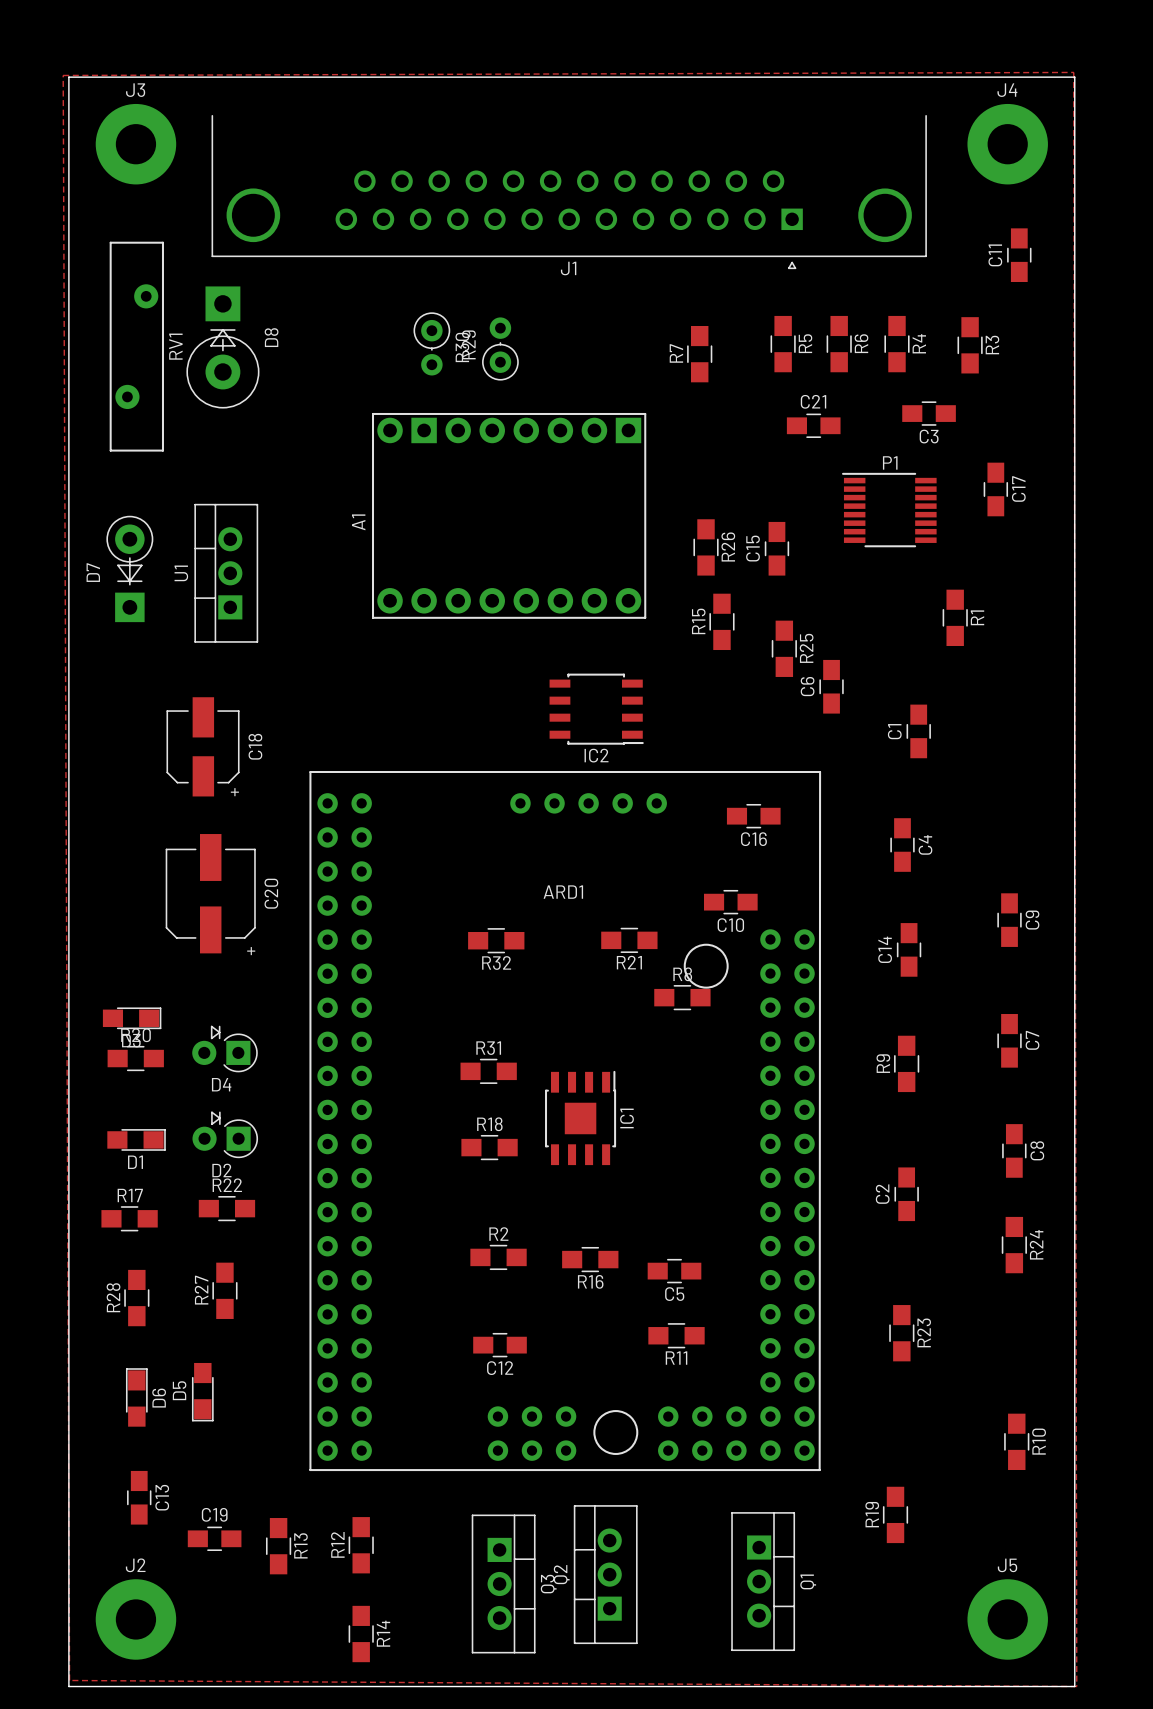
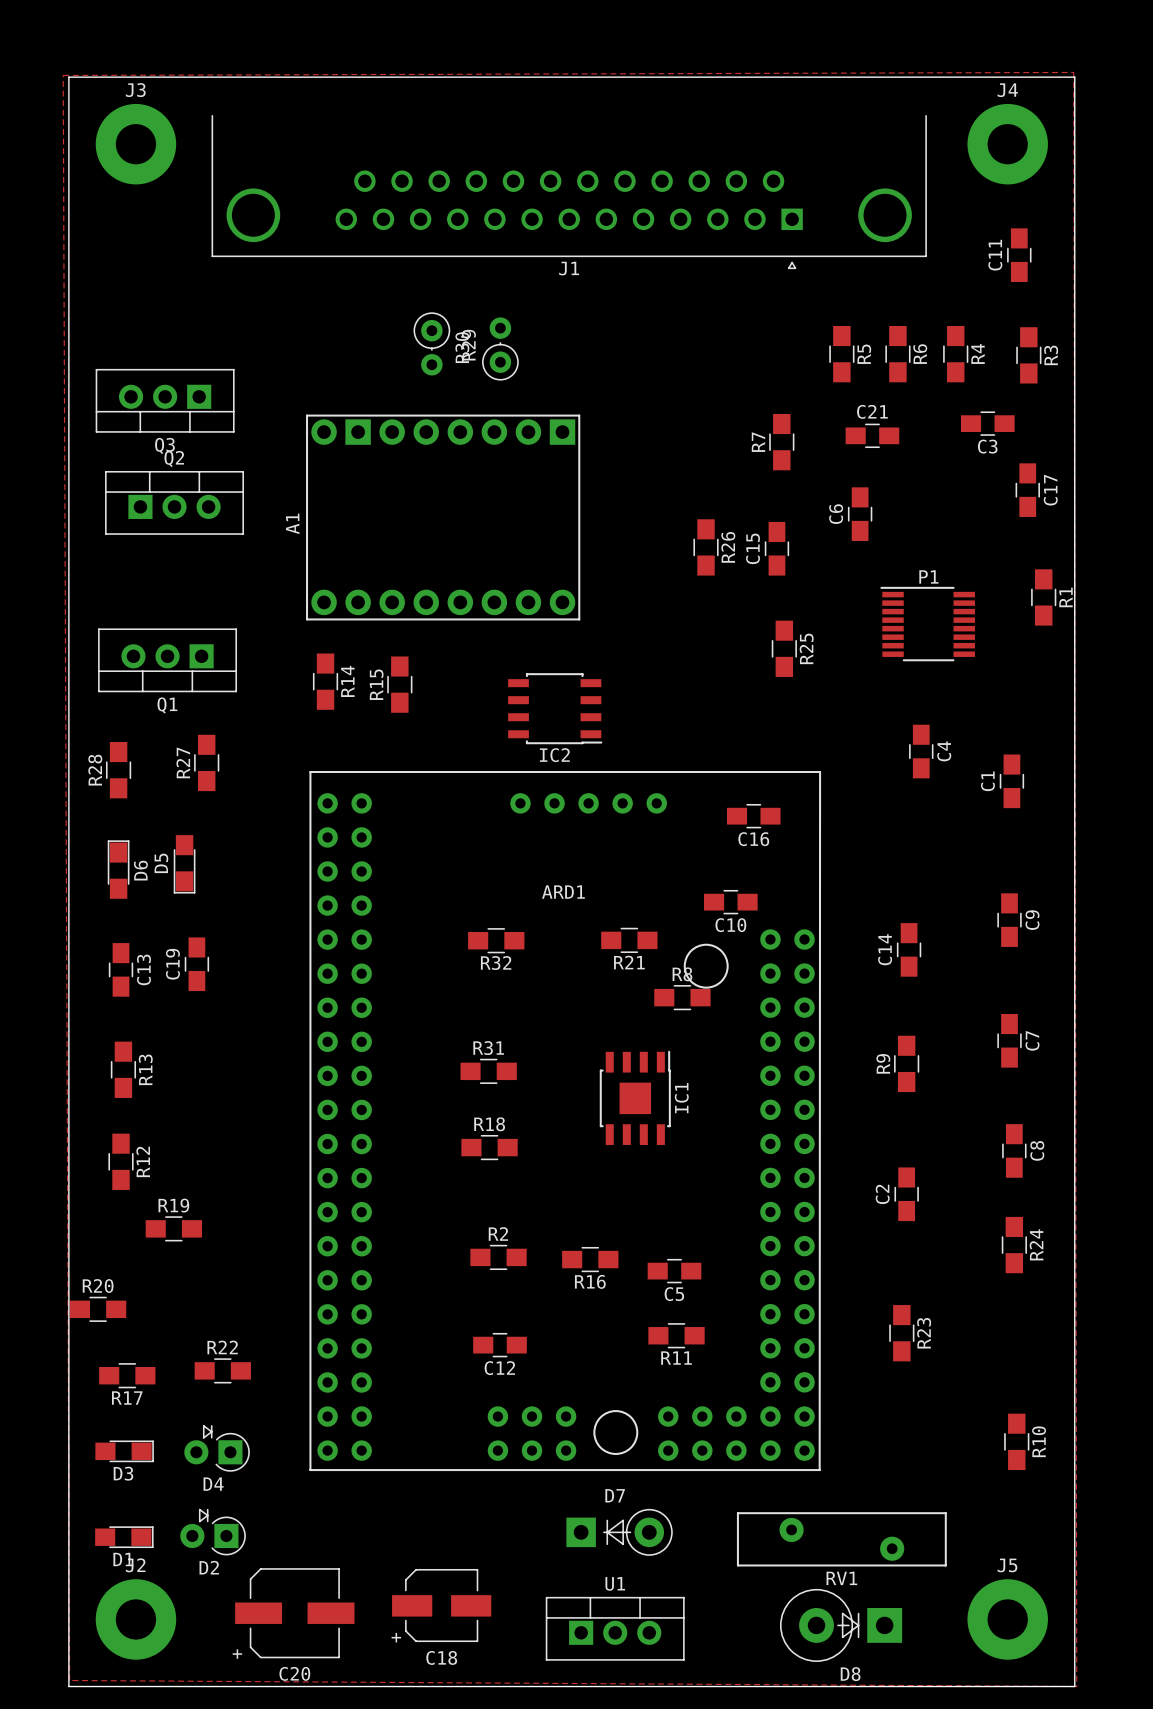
R5 position: (783, 344) -> (841, 354)
R6 position: (839, 344) -> (897, 354)
R4 position: (896, 344) -> (955, 354)
R3 position: (970, 345) -> (1028, 355)
RV1 rotation: 0° (136, 346) -> 90° clockwise (841, 1539)
RV1 position: (136, 346) -> (841, 1539)
D8 rotation: 0° (222, 347) -> 90° clockwise (841, 1625)
D8 position: (222, 347) -> (841, 1625)
R7 position: (699, 354) -> (781, 442)
C3 position: (929, 413) -> (987, 423)
C21 position: (813, 425) -> (872, 435)
C17 position: (995, 489) -> (1027, 490)
P1 position: (889, 510) -> (927, 624)
A1 position: (509, 515) -> (443, 517)
D7 rotation: 0° (129, 568) -> 90° clockwise (619, 1532)
D7 position: (129, 568) -> (619, 1532)
U1 rotation: 0° (226, 573) -> 90° clockwise (615, 1628)
U1 position: (226, 573) -> (615, 1628)
R1 position: (955, 617) -> (1043, 597)
R15 position: (721, 621) -> (399, 684)
C6 position: (831, 686) -> (860, 514)
IC2 position: (596, 709) -> (555, 708)
C1 position: (918, 731) -> (1011, 781)
C18 rotation: 0° (203, 746) -> 90° clockwise (441, 1605)
C18 position: (203, 746) -> (441, 1605)
C4 position: (902, 845) -> (921, 751)
C20 rotation: 0° (210, 893) -> 90° clockwise (294, 1613)
C20 position: (210, 893) -> (294, 1613)
D3 position: (132, 1018) -> (124, 1451)
D4 position: (225, 1049) -> (217, 1448)
R20 position: (135, 1058) -> (98, 1309)
D2 footprint: [192, 1111, 259, 1159] -> [180, 1508, 246, 1556]
IC1 position: (580, 1117) -> (635, 1097)
D1 position: (136, 1139) -> (124, 1537)
R17 name position: R17 (130, 1195) -> R17 (127, 1398)
R22 position: (226, 1208) -> (222, 1370)
R17 position: (129, 1218) -> (127, 1375)
R27 position: (224, 1290) -> (206, 762)
R28 position: (136, 1298) -> (118, 770)
D5 position: (202, 1392) -> (184, 864)
D6 position: (136, 1397) -> (118, 869)
C13 position: (139, 1497) -> (121, 969)
C19 name position: C19 (214, 1514) -> C19 (172, 964)
R19 rotation: 0° (895, 1514) -> 90° clockwise (173, 1228)
R19 position: (895, 1514) -> (173, 1228)
C19 rotation: 0° (214, 1538) -> 90° clockwise (196, 964)
C19 position: (214, 1538) -> (196, 964)
R12 name position: R12 (337, 1544) -> R12 (143, 1161)
R12 position: (361, 1545) -> (121, 1161)
R13 position: (278, 1546) -> (123, 1069)
Q2 rotation: 0° (605, 1574) -> 90° clockwise (174, 502)
Q2 position: (605, 1574) -> (174, 502)
Q1 rotation: 0° (763, 1581) -> 90° clockwise (167, 660)
Q1 position: (763, 1581) -> (167, 660)
Q3 rotation: 0° (503, 1583) -> 90° clockwise (165, 400)
Q3 position: (503, 1583) -> (165, 400)
R14 position: (361, 1634) -> (325, 681)

